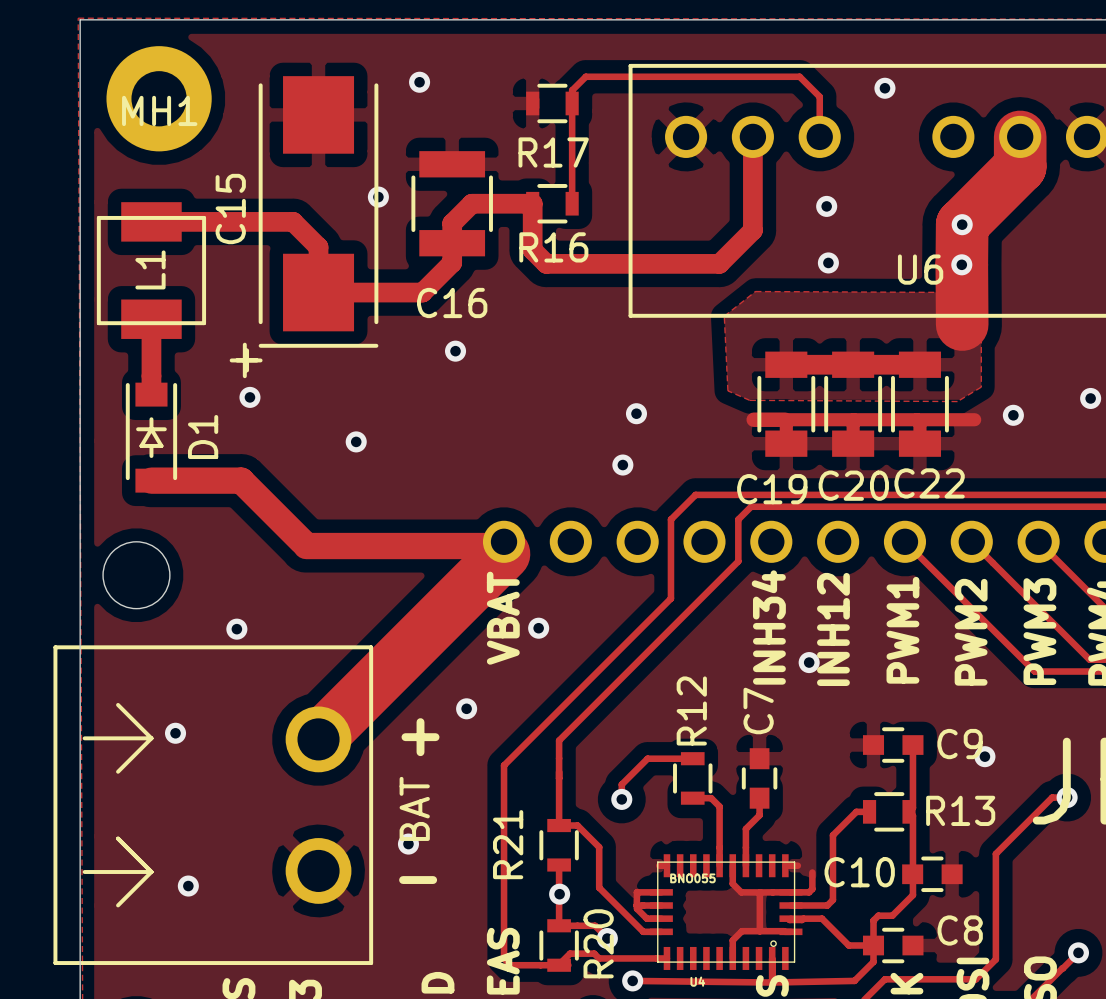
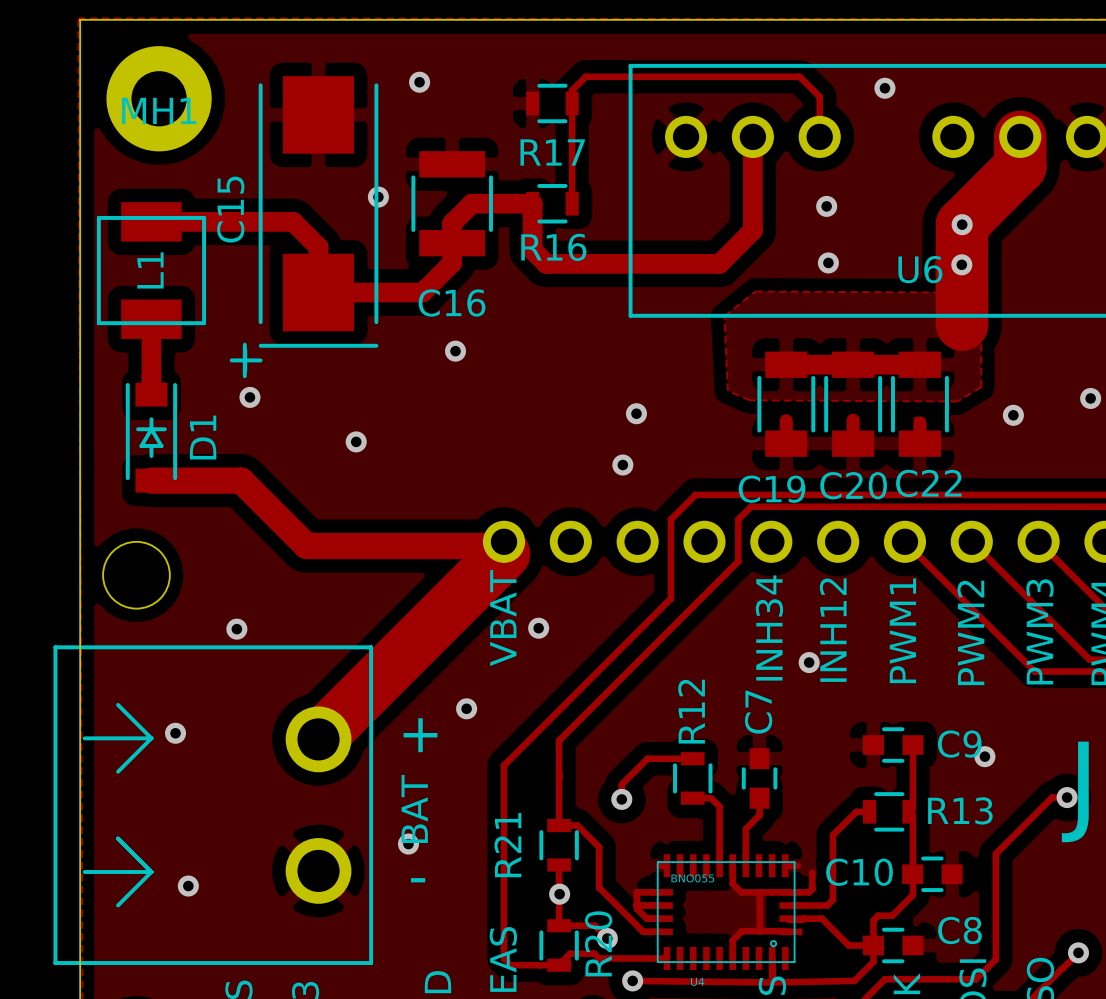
track: (753, 419) (974, 419) -> none

